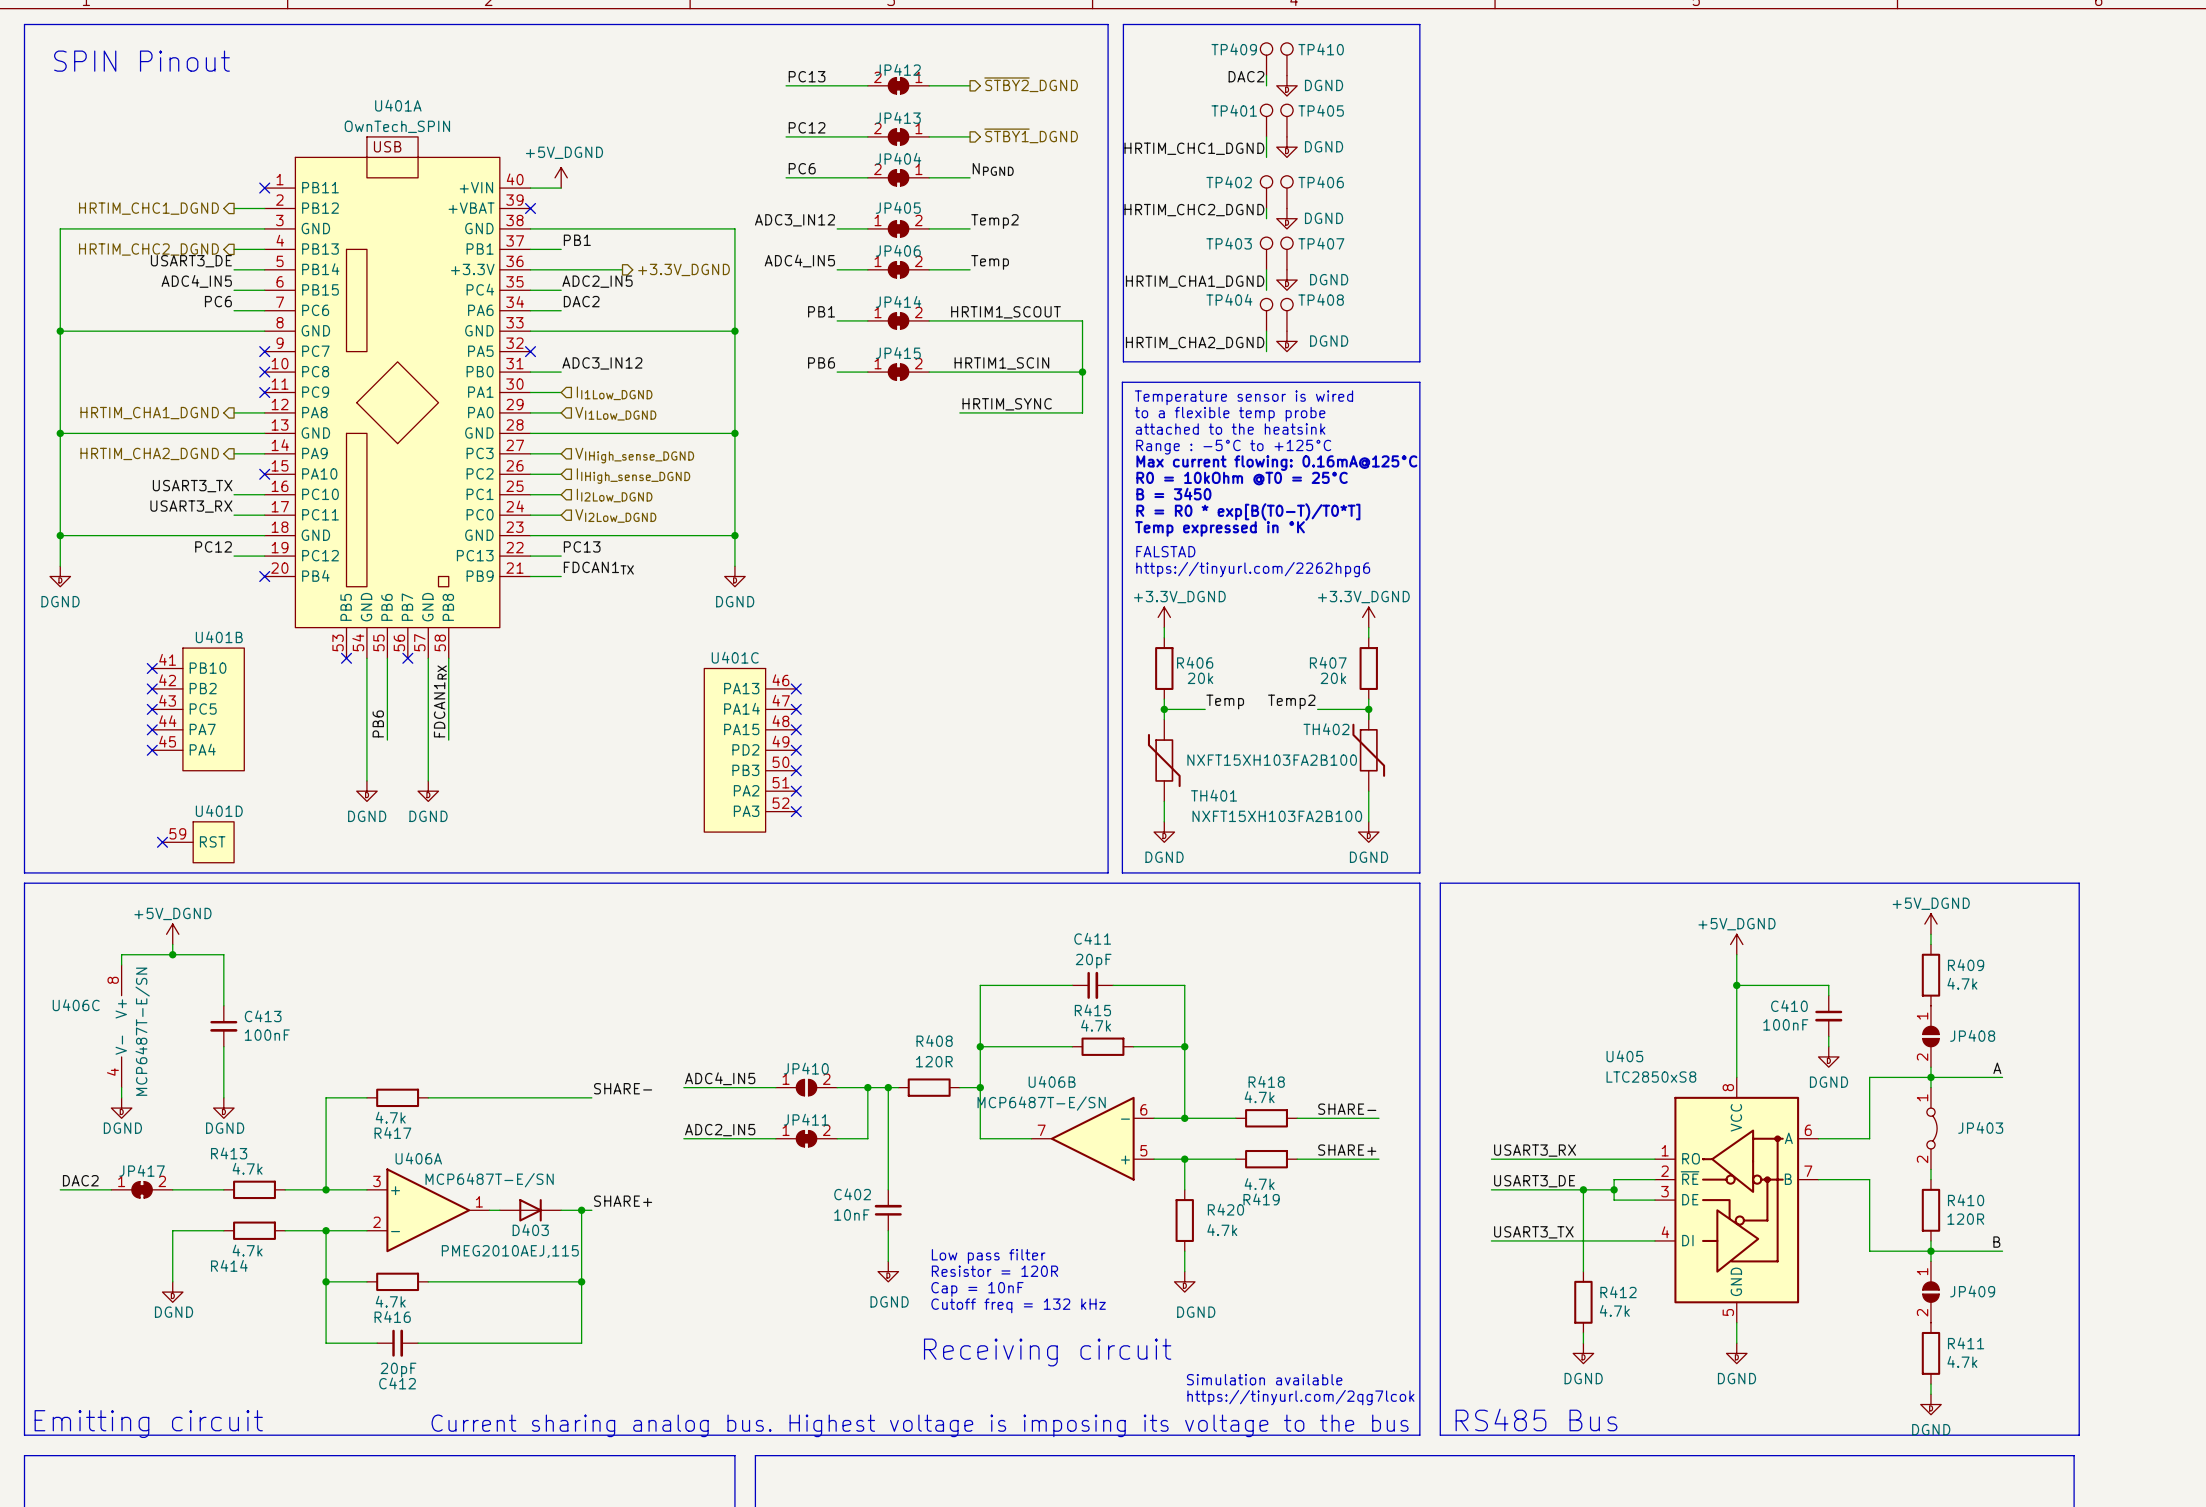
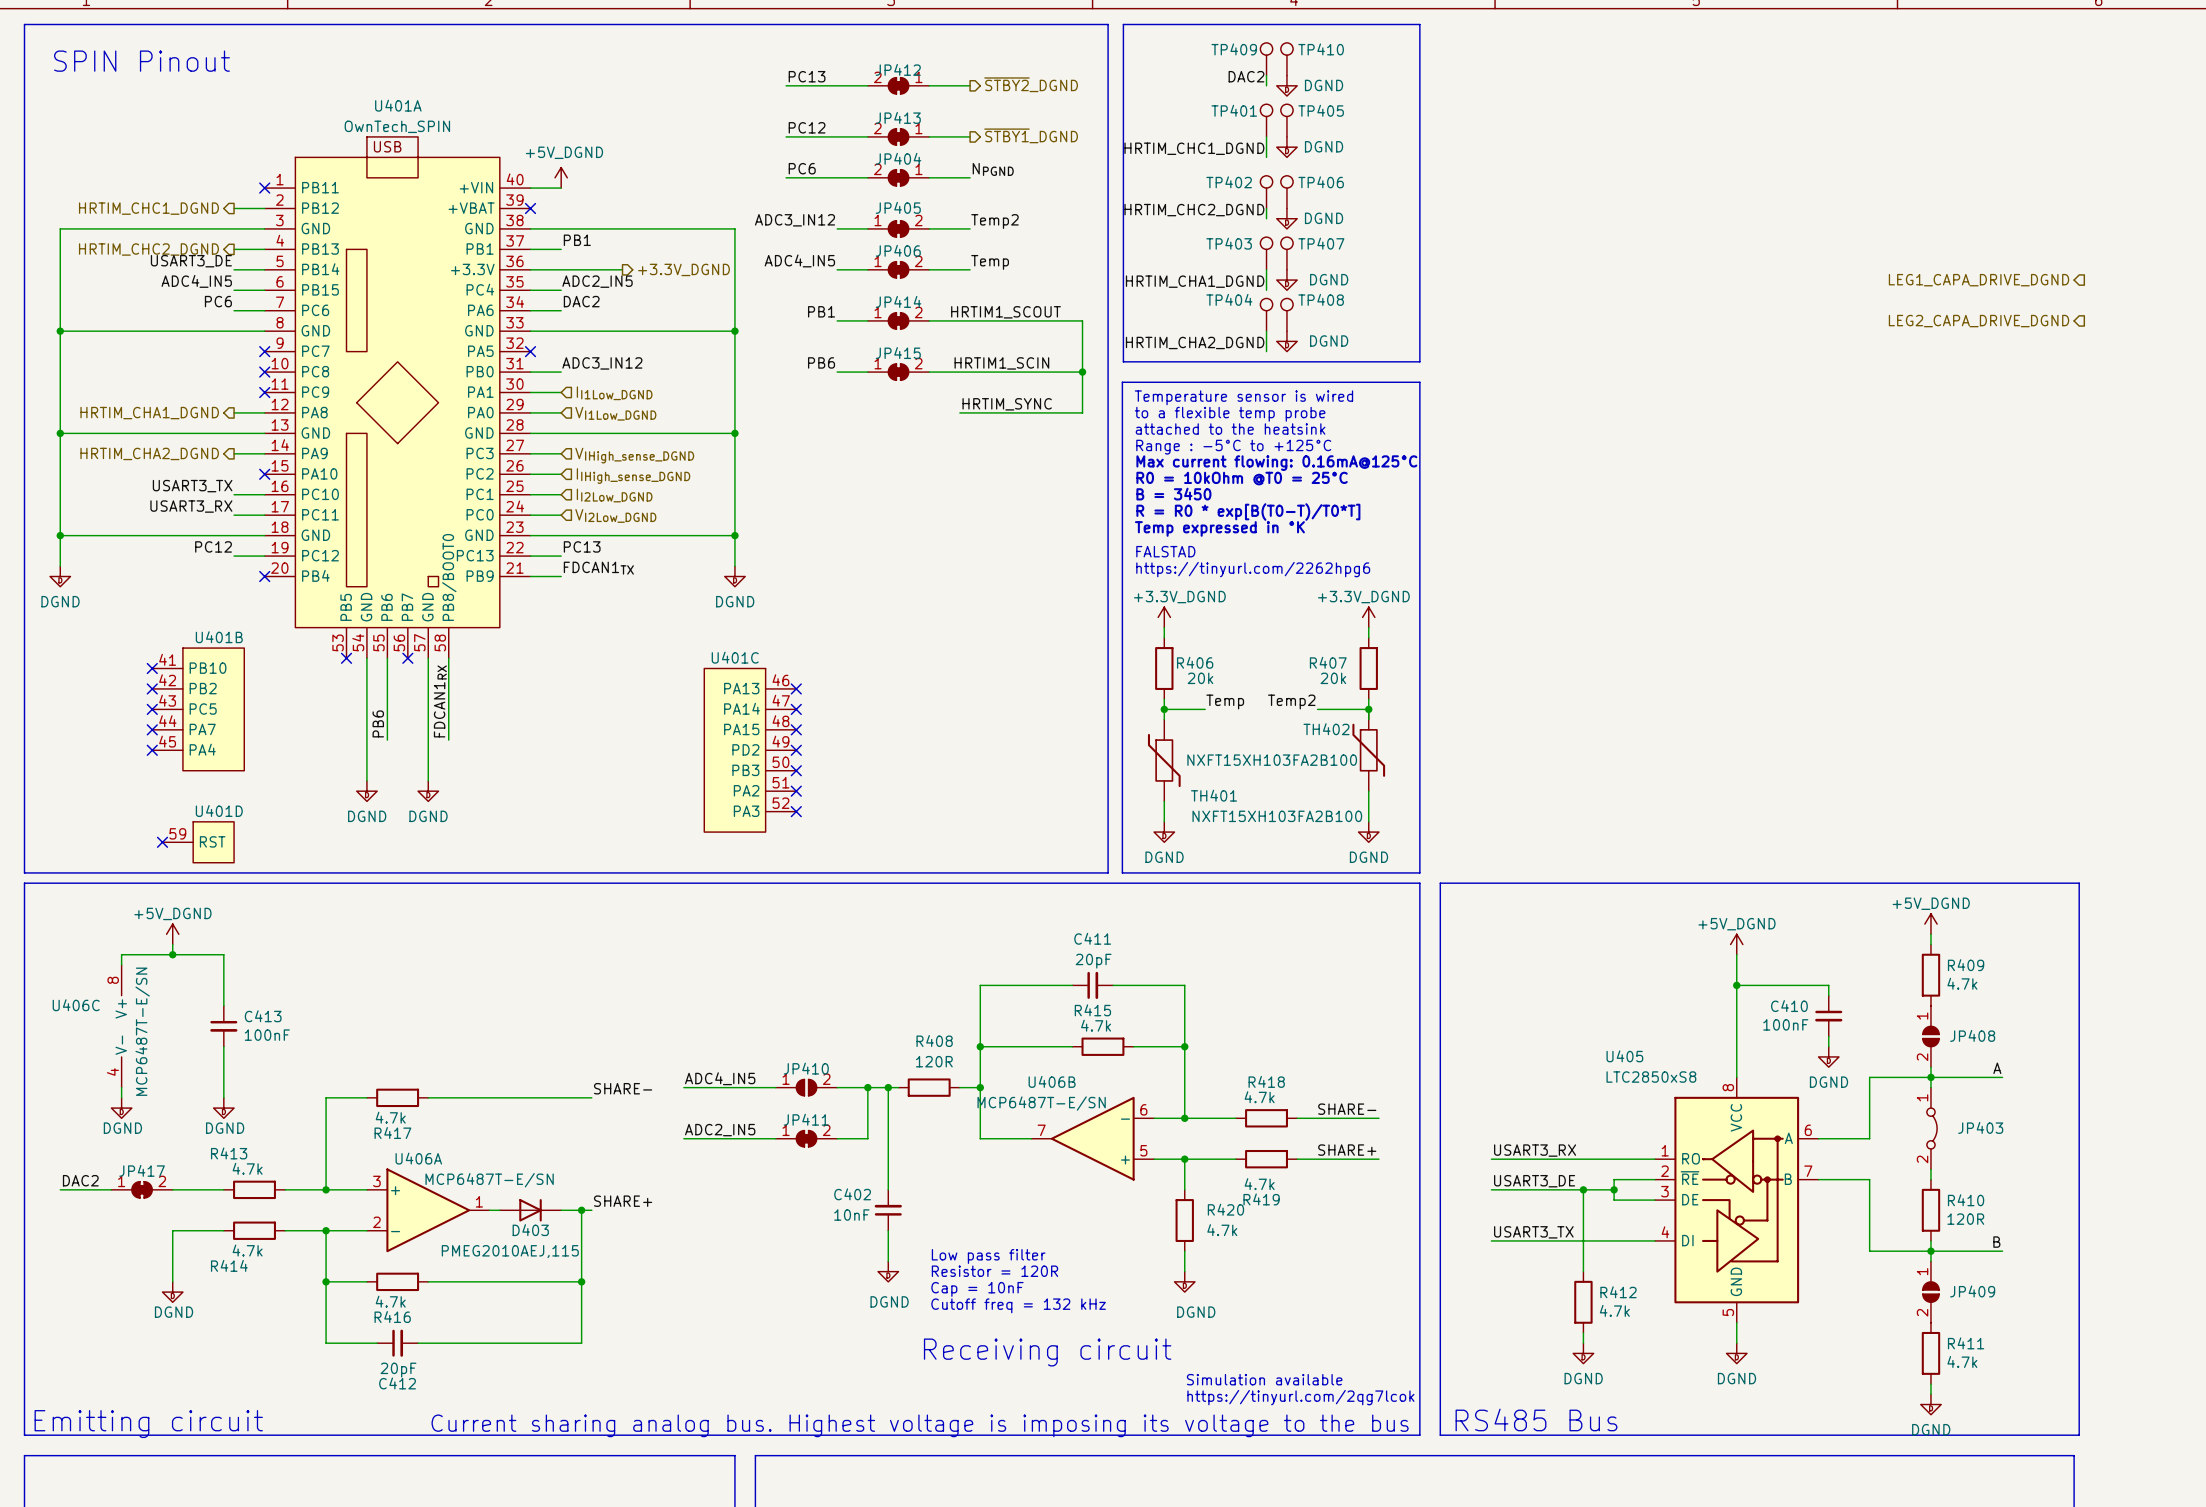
U401A symbol: [264, 136, 531, 659] -> [264, 136, 531, 659]
hierarchical label: none -> LEG1_CAPA_DRIVE_DGND (1979, 280)
hierarchical label: none -> LEG2_CAPA_DRIVE_DGND (1979, 321)

